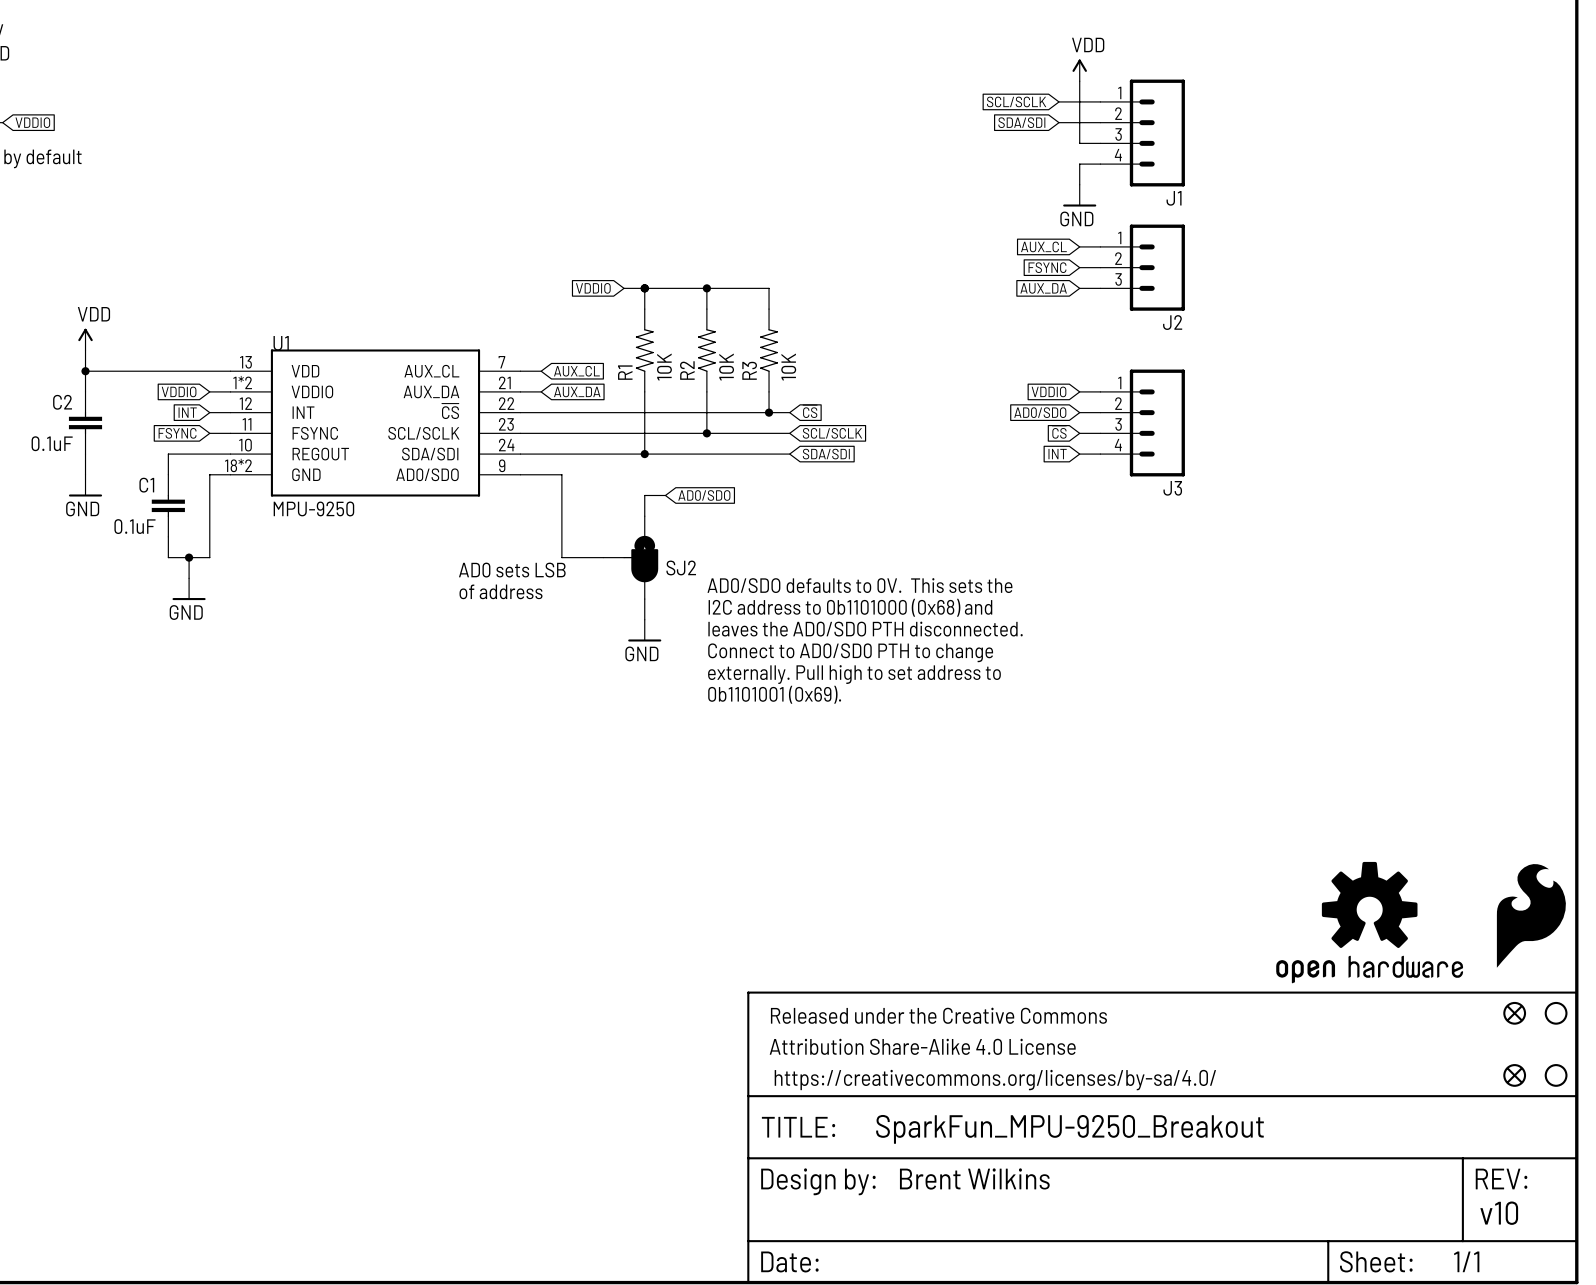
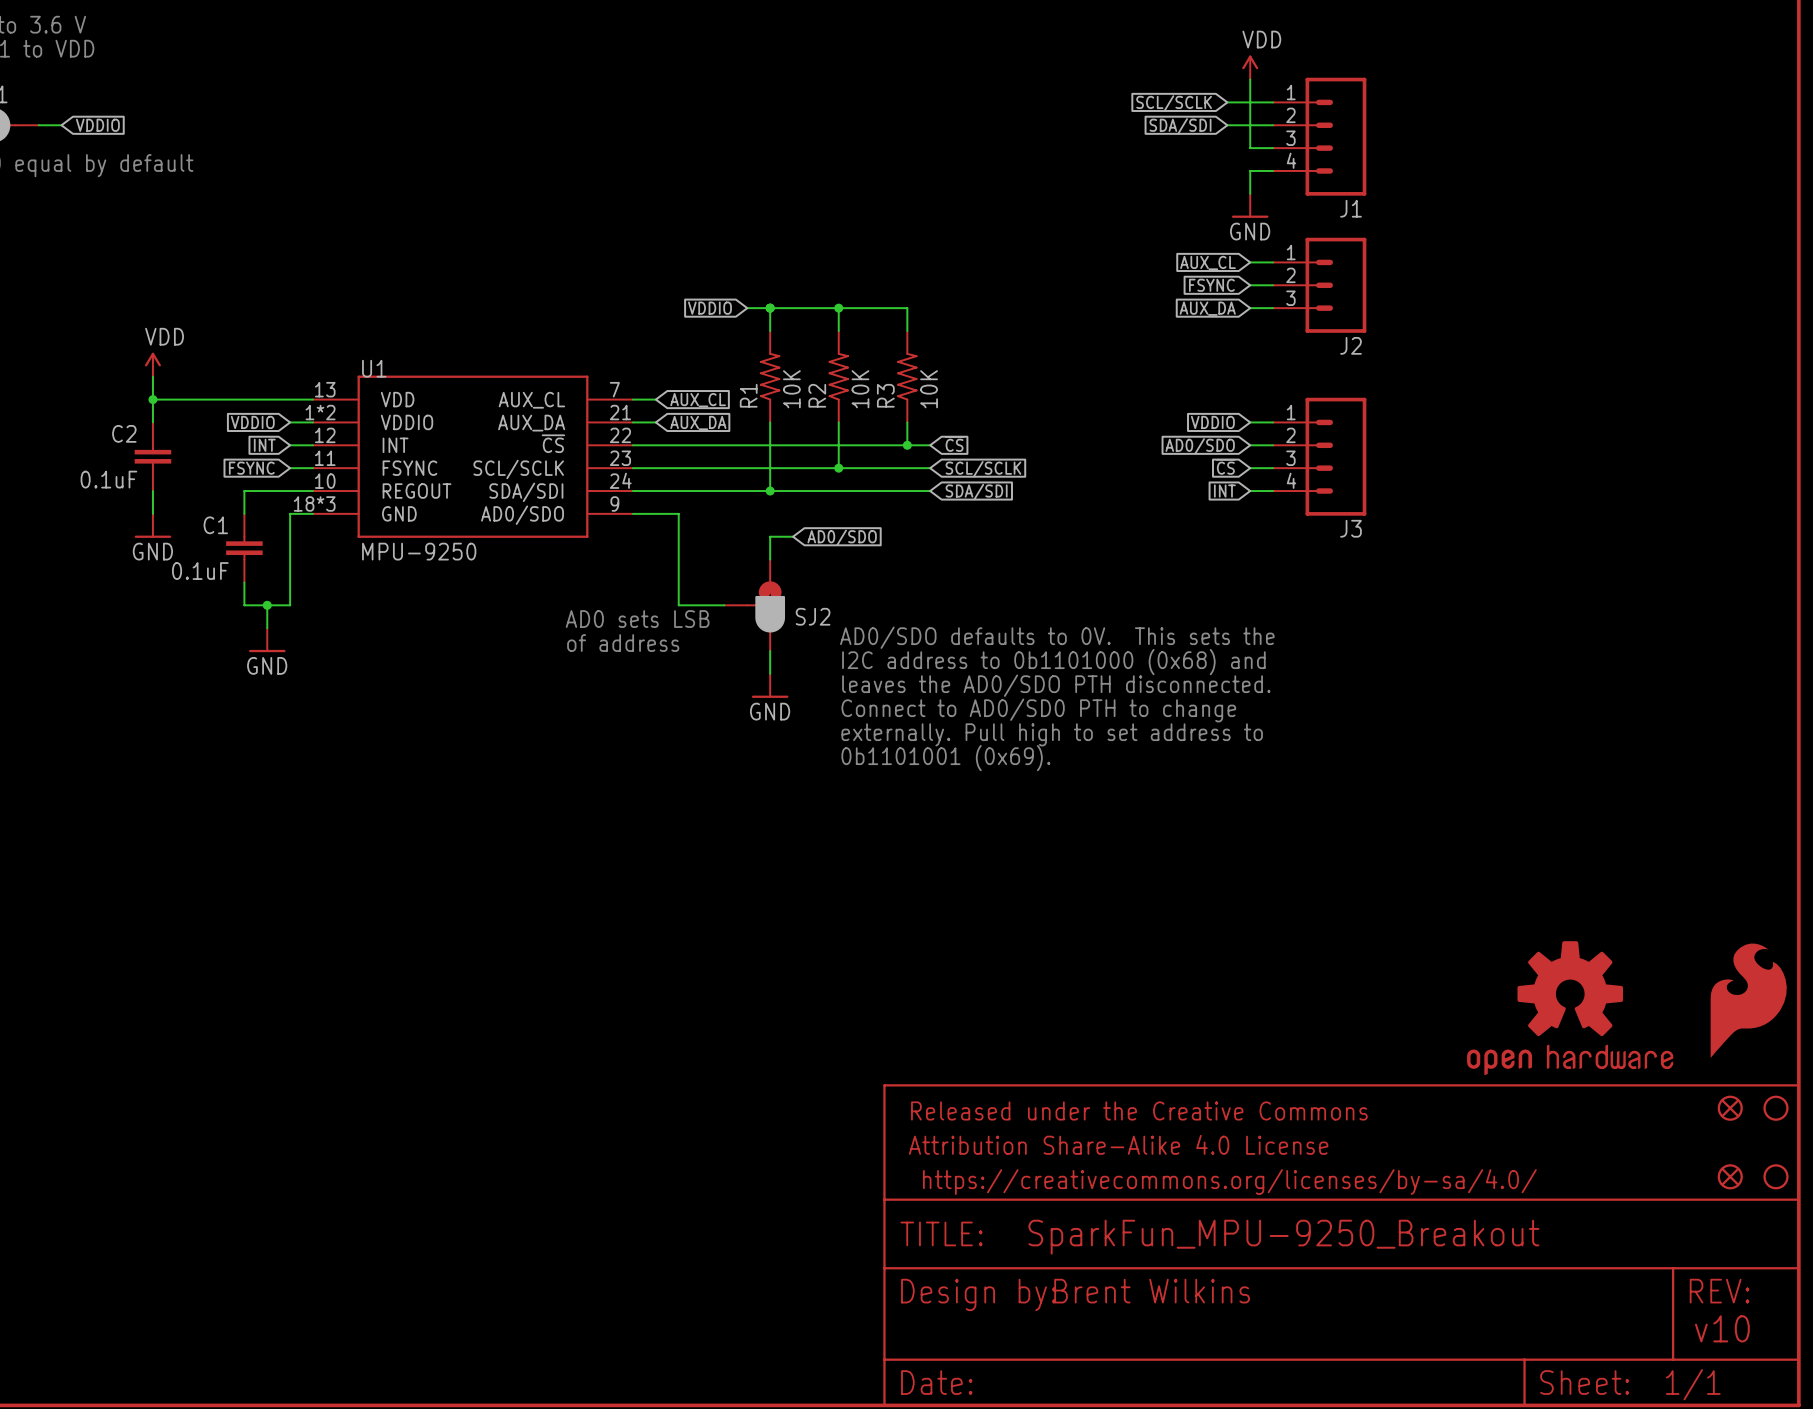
U1 pin number: 18*2 (238, 465) -> 18*3 (314, 503)

